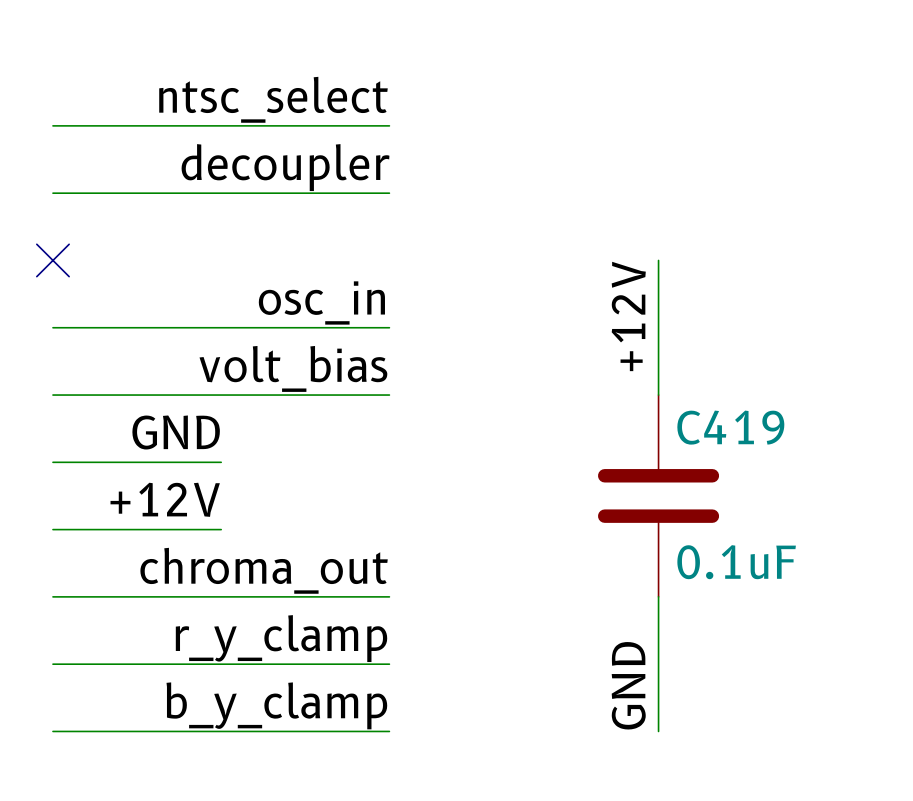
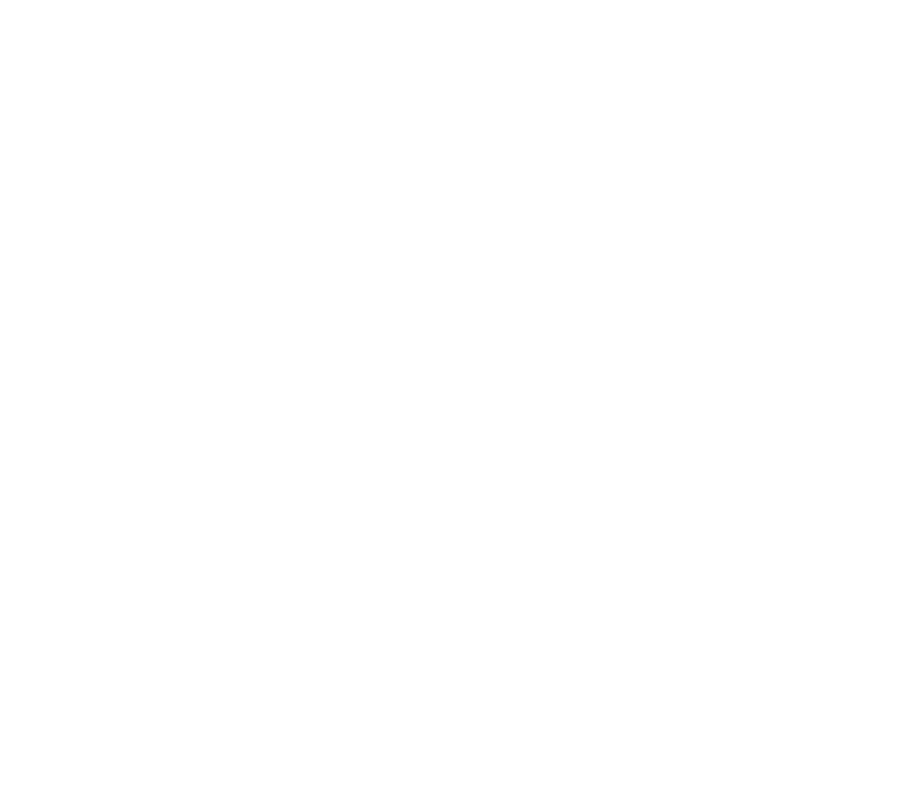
label: ntsc_select (273, 99) -> none
wire: (52, 125) (389, 125) -> none
label: decoupler (285, 167) -> none
wire: (52, 193) (389, 193) -> none
no-connect mark: (52, 260) -> none
wire: (658, 260) (658, 395) -> none
label: osc_in (321, 302) -> none
label: +12V (628, 316) -> none
wire: (52, 327) (389, 327) -> none
label: volt_bias (293, 368) -> none
wire: (52, 395) (389, 395) -> none
label: GND (176, 432) -> none
wire: (52, 462) (221, 462) -> none
C419: 0.1uF (658, 495) -> none
label: +12V (165, 499) -> none
wire: (52, 529) (221, 529) -> none
label: chroma_out (264, 570) -> none
wire: (52, 596) (389, 596) -> none
wire: (658, 596) (658, 731) -> none
label: r_y_clamp (281, 638) -> none
wire: (52, 664) (389, 664) -> none
label: GND (628, 685) -> none
label: b_y_clamp (276, 705) -> none
wire: (52, 731) (389, 731) -> none

